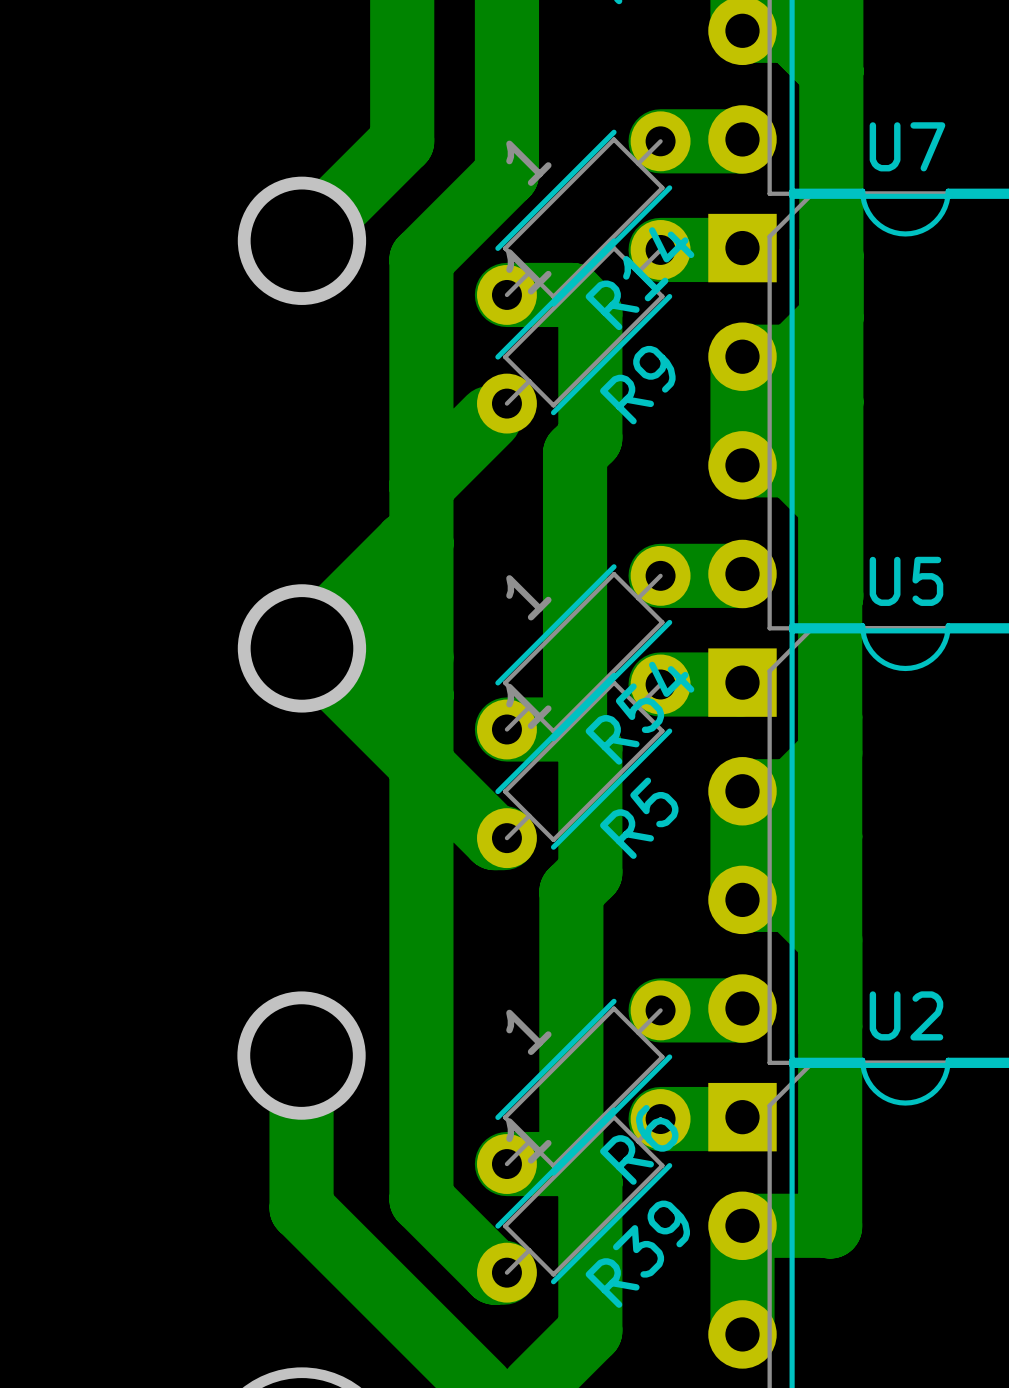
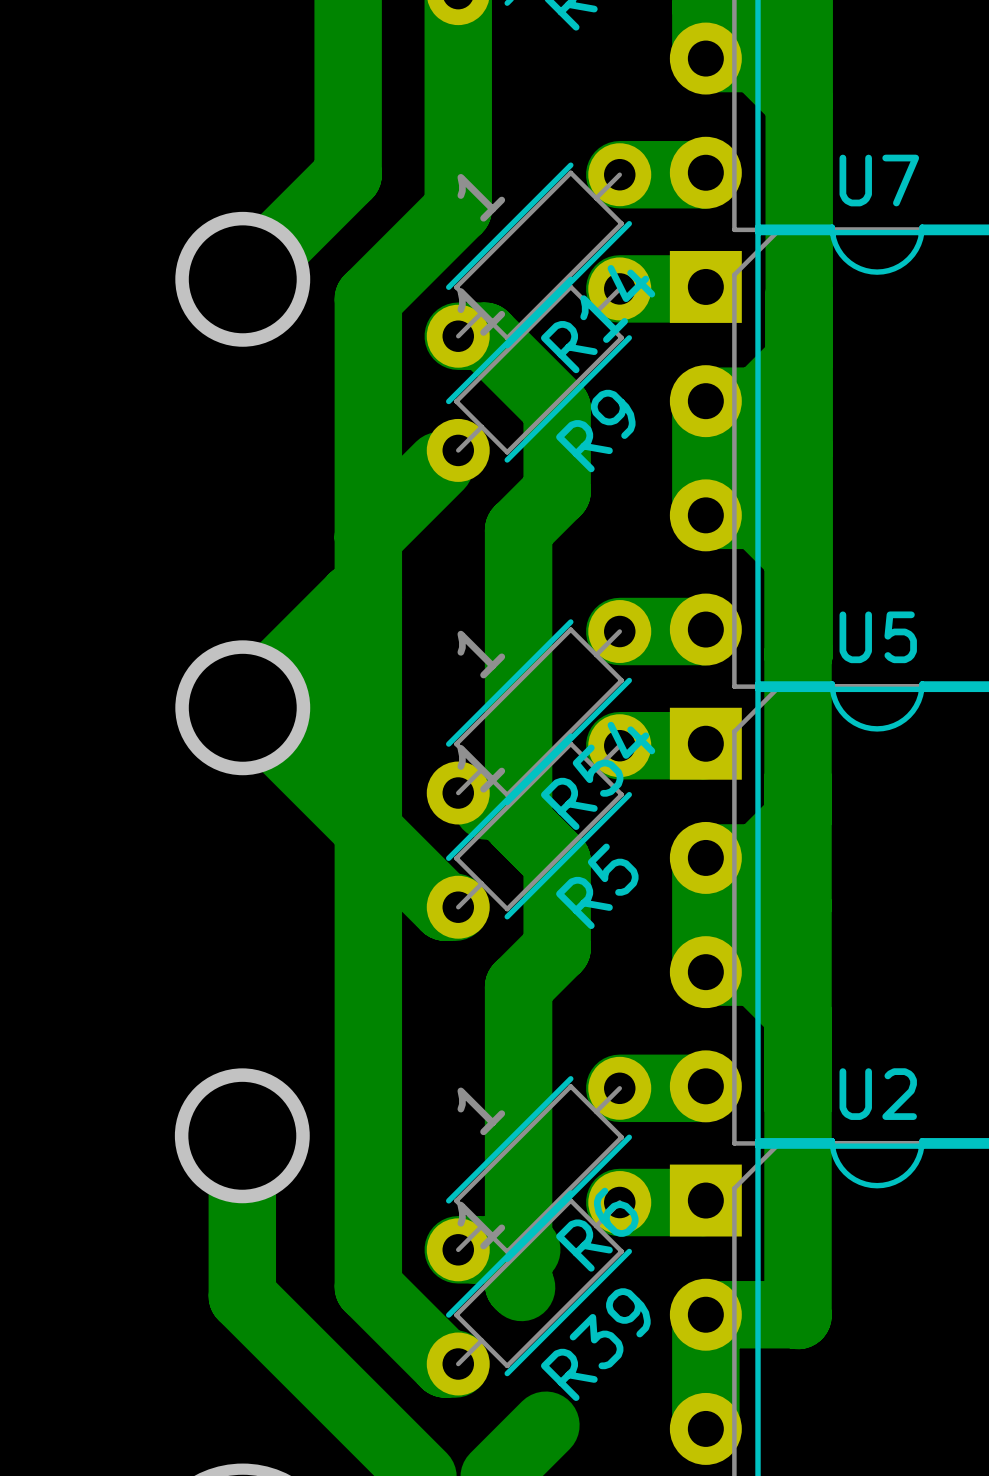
bottom track: (532, 294) (572, 294) (590, 313) (590, 438) (575, 453) (575, 732) -> (484, 336) (557, 408) (557, 491) (518, 529) (518, 823)
bottom track: (506, 729) (572, 729) (590, 747) (590, 872) (571, 891) (571, 1163) (590, 1182) (590, 1330) -> none
bottom track: none -> (487, 806) (501, 806) (557, 861) (557, 948) (518, 986) (518, 1284) (521, 1287)

